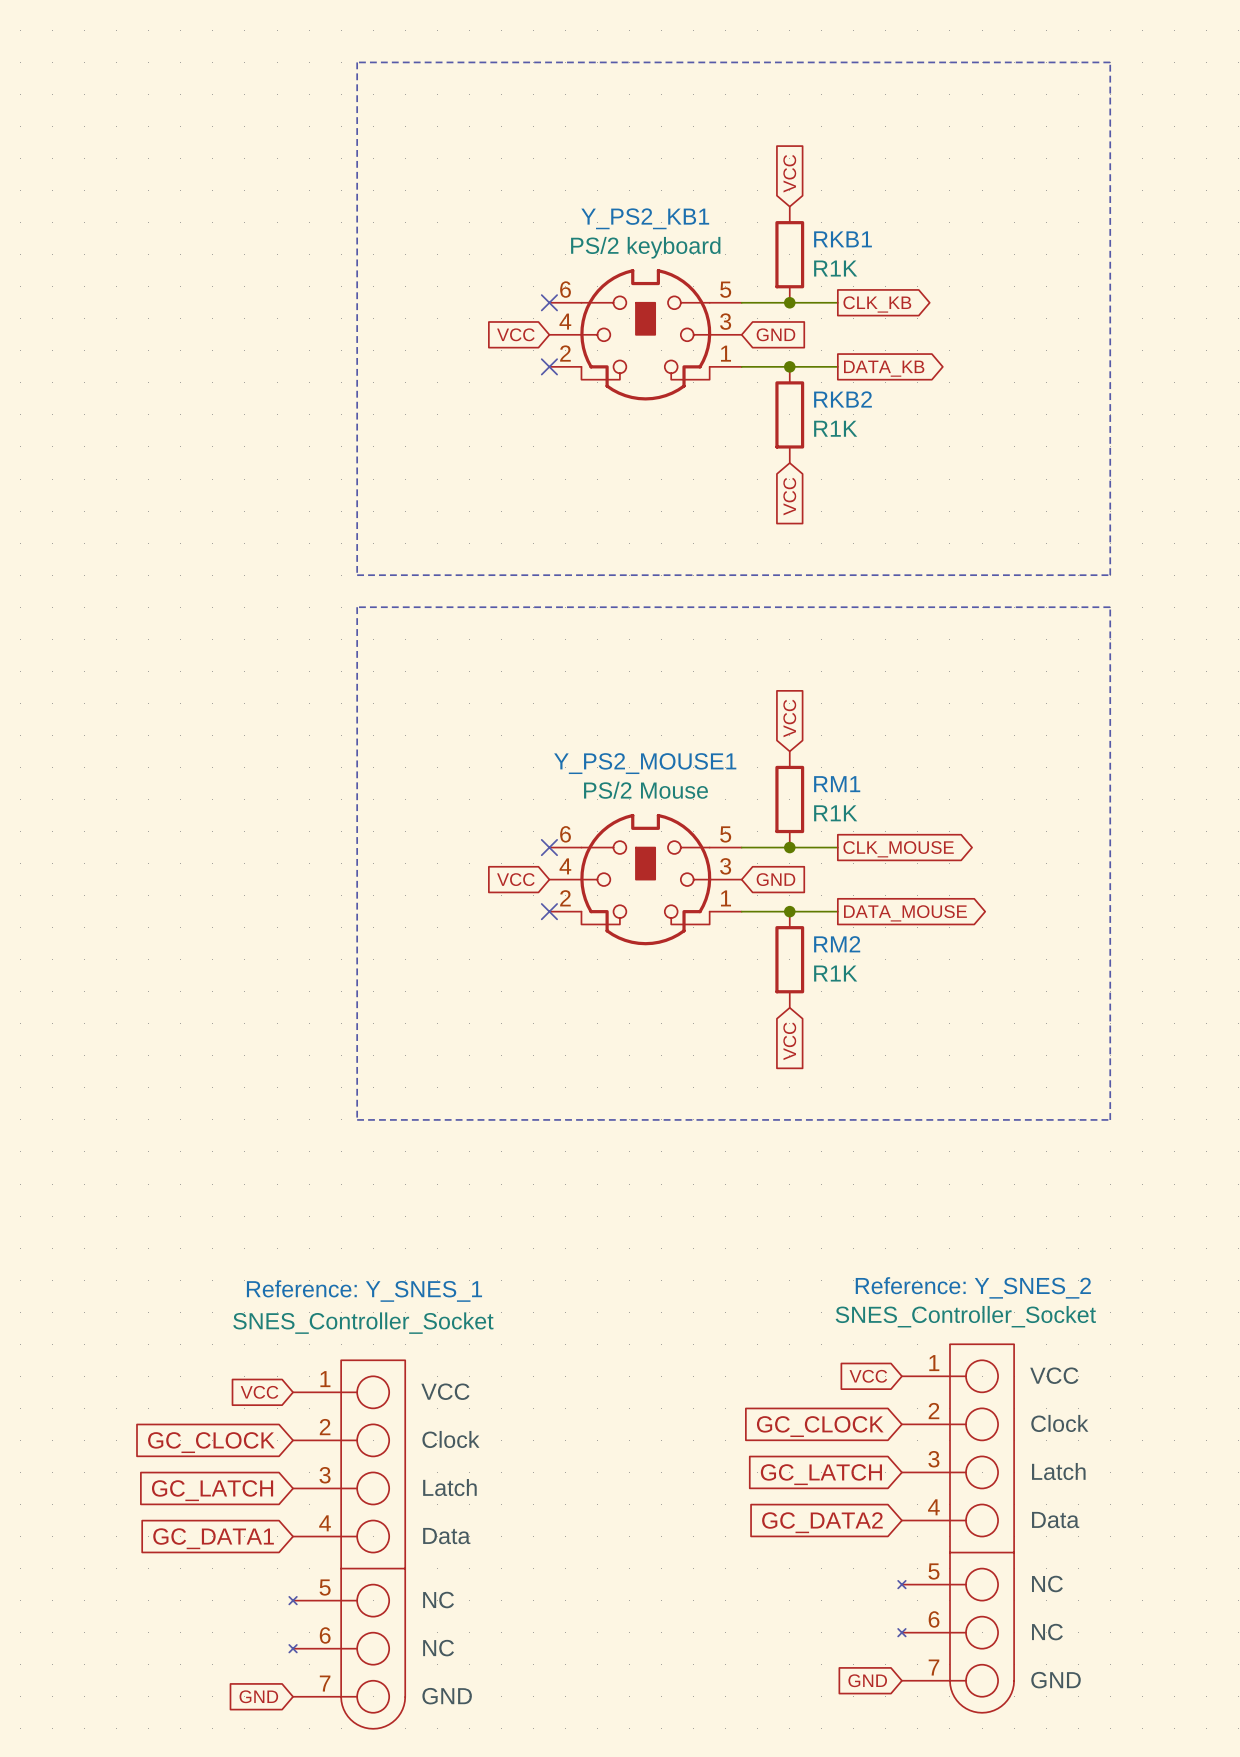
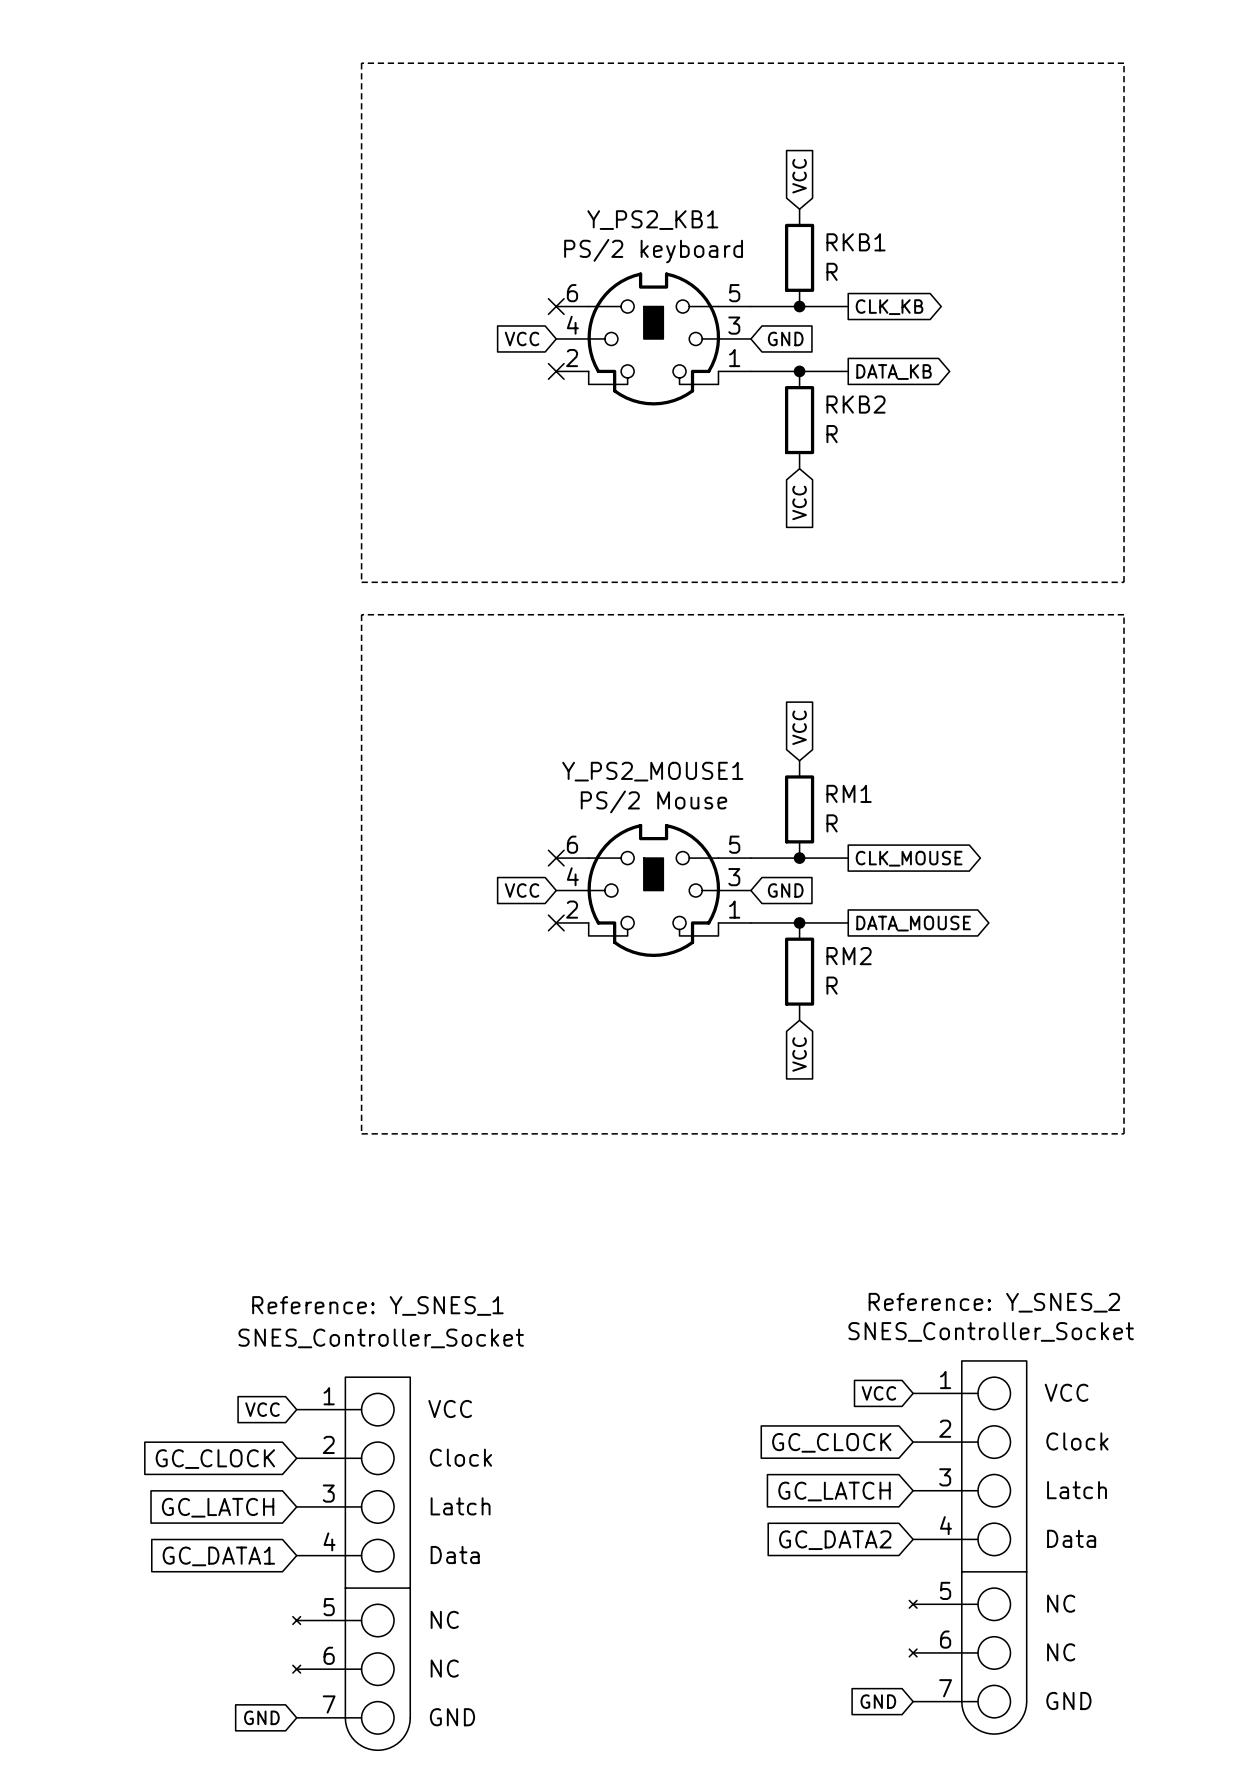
RKB1 value: R1K (835, 268) -> R (832, 271)
RKB2 value: R1K (835, 428) -> R (832, 434)
RM1 value: R1K (835, 813) -> R (832, 823)
RM2 value: R1K (835, 973) -> R (832, 985)

